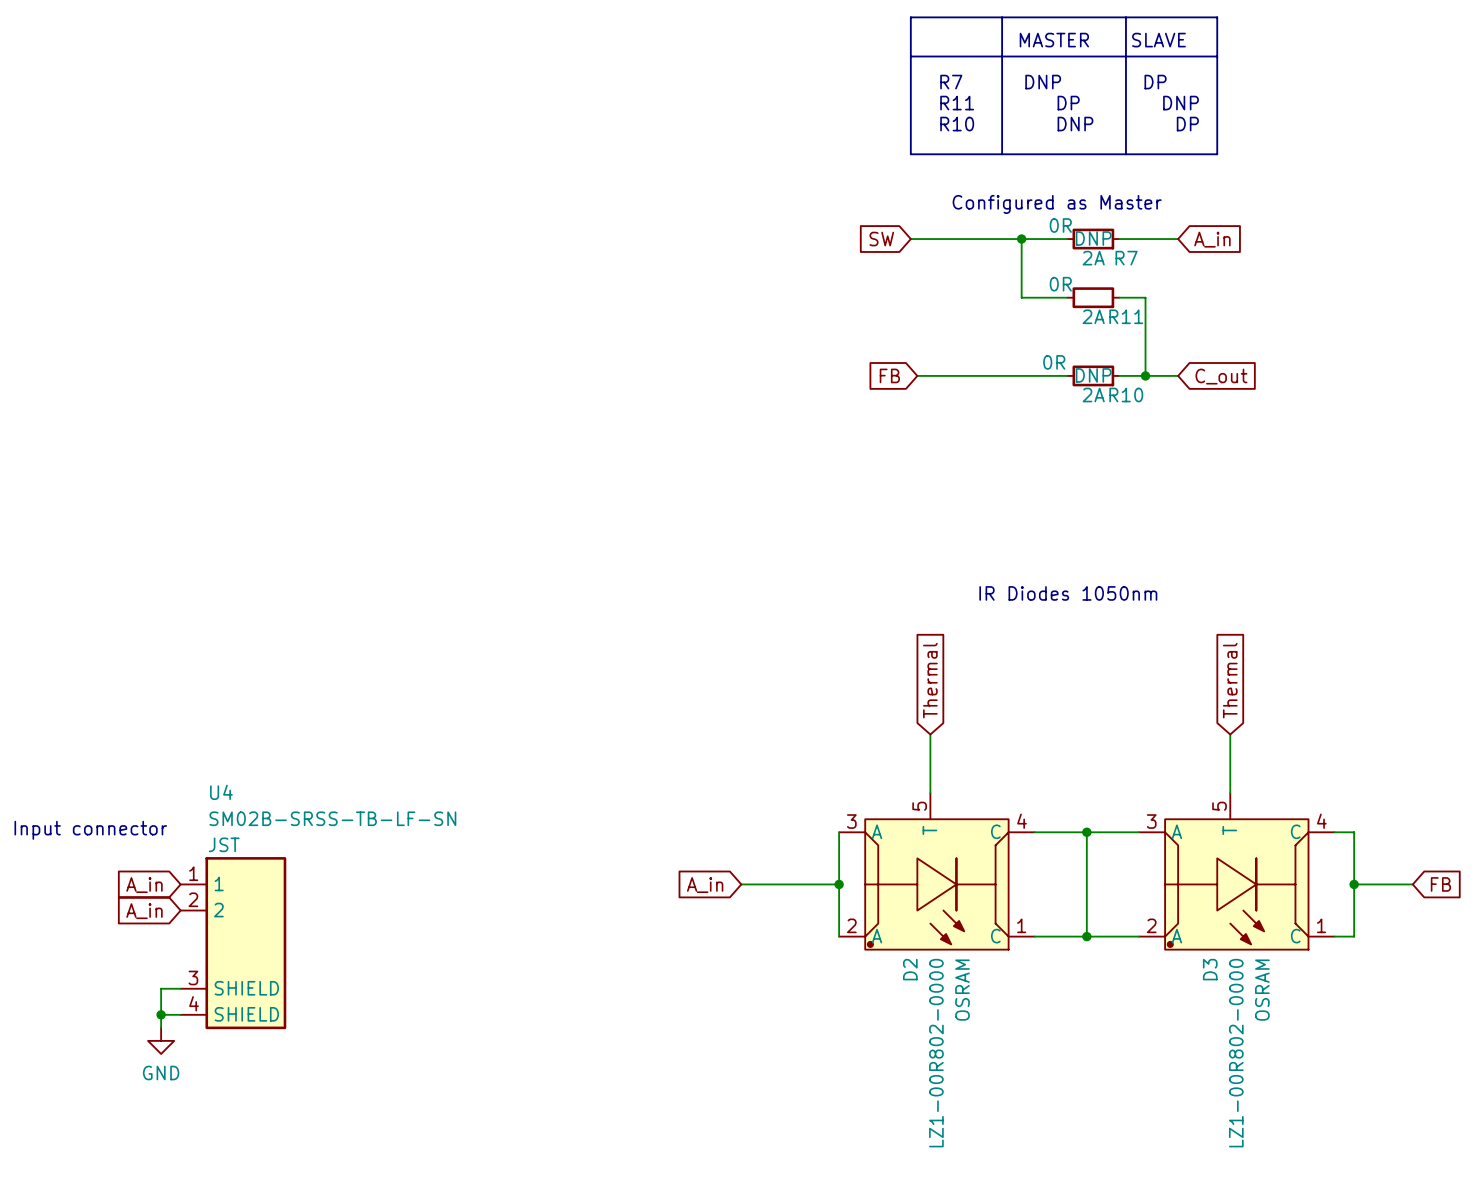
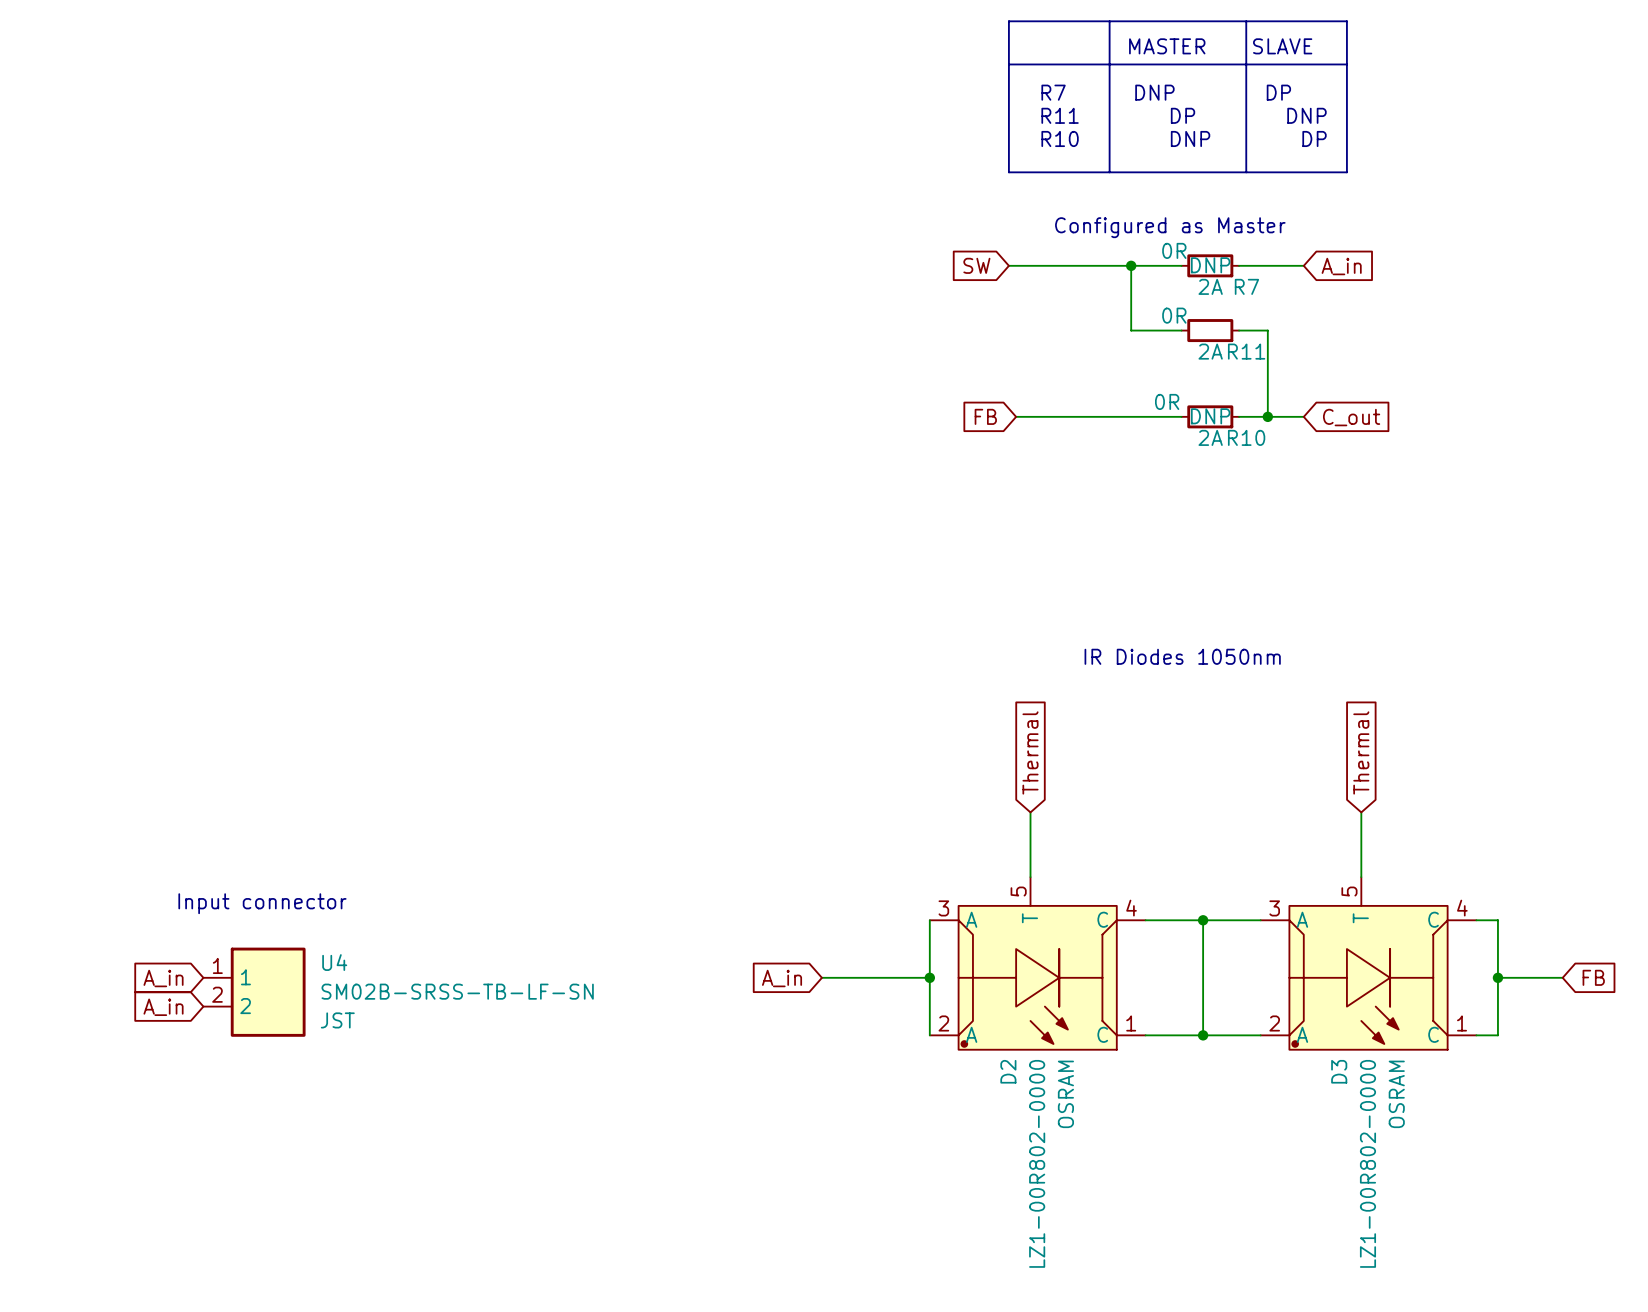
U4 name position: U4 (221, 792) -> U4 (334, 962)
U4 value position: SM02B-SRSS-TB-LF-SN (332, 818) -> SM02B-SRSS-TB-LF-SN (457, 991)
text position: Input connector (90, 830) -> Input connector (262, 903)
U4 text position: JST (224, 844) -> JST (337, 1020)
U4 symbol: [180, 857, 287, 1030] -> [203, 947, 306, 1037]
wire: (180, 988) (161, 988) (161, 1027) -> none
wire: (161, 1014) (180, 1014) -> none
junction: (161, 1014) -> none
power symbol: GND (161, 1040) -> none

